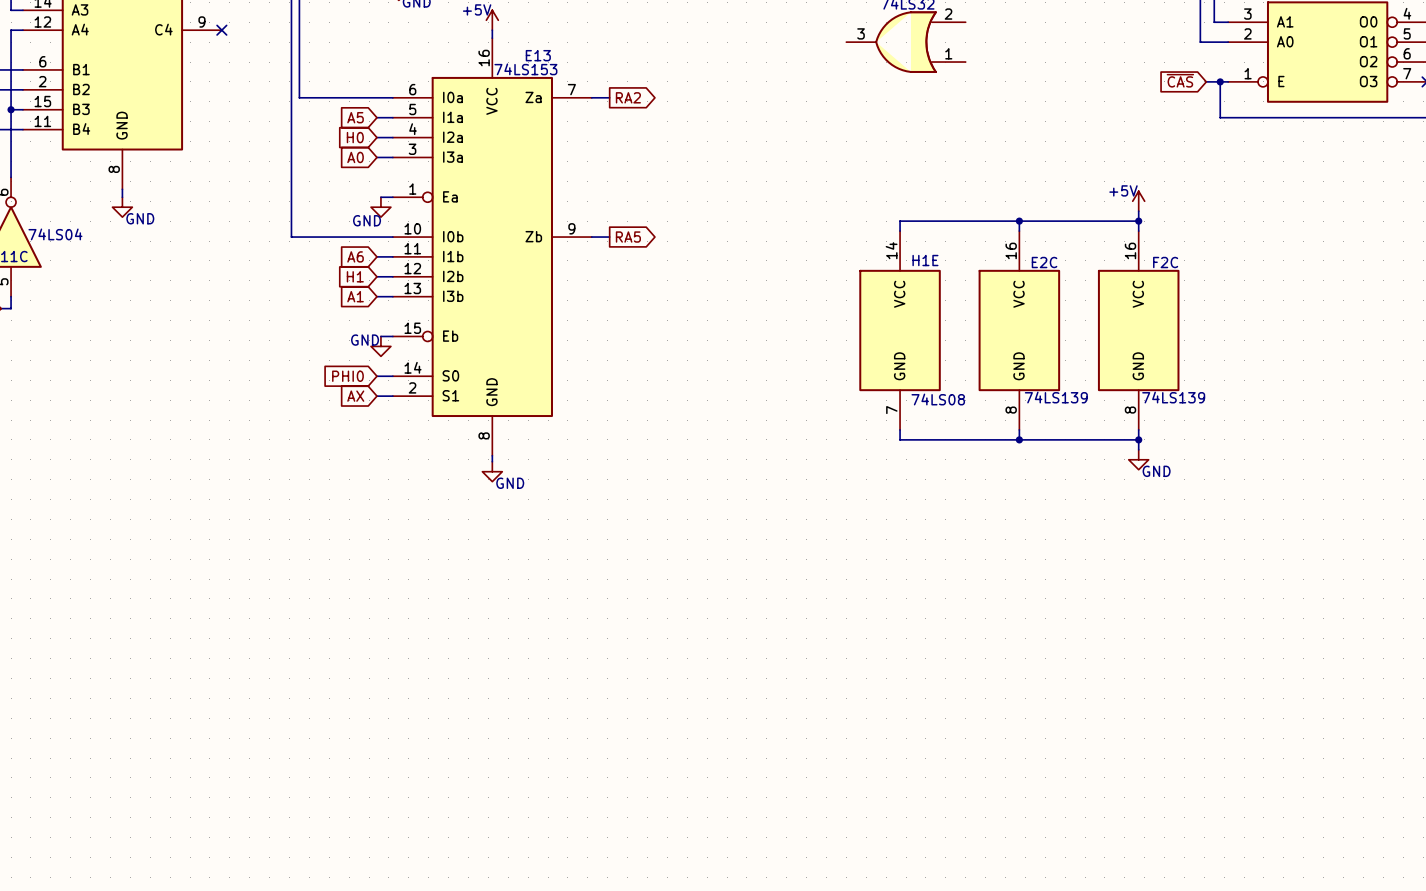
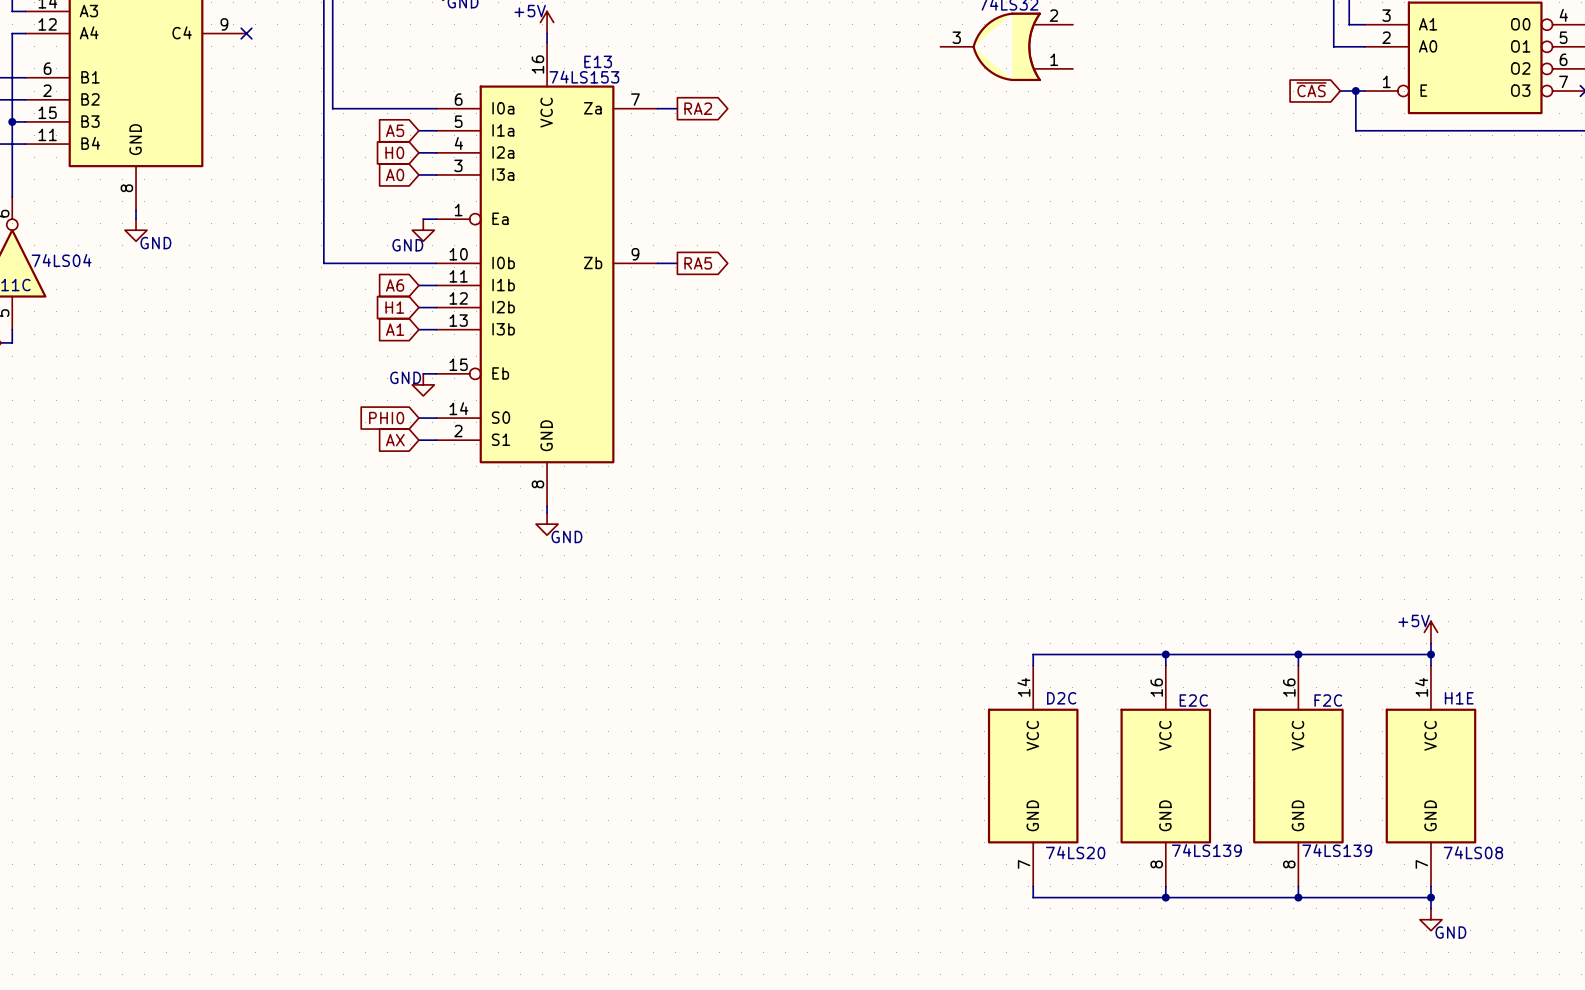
power symbol: +5V (1138, 201) -> none
wire: (1138, 211) (1138, 231) -> none
wire: (1019, 221) (1019, 231) -> none
junction: (1019, 221) -> none
wire: (1138, 221) (900, 221) (900, 231) -> none
junction: (1138, 221) -> none
H1E position: (900, 330) -> (1430, 776)
E2C position: (1019, 330) -> (1165, 776)
F2C position: (1138, 330) -> (1298, 776)
wire: (900, 429) (900, 439) (1138, 439) -> none
wire: (1019, 429) (1019, 439) -> (1165, 654) (1165, 665)
wire: (1138, 429) (1138, 449) -> none
junction: (1019, 439) -> none
junction: (1138, 439) -> none
power symbol: GND (1138, 459) -> none
power symbol: none -> +5V (1430, 632)
wire: none -> (1430, 643) (1430, 665)
junction: none -> (1165, 654)
wire: none -> (1298, 654) (1298, 665)
junction: none -> (1298, 654)
wire: none -> (1430, 654) (1033, 654) (1033, 665)
junction: none -> (1430, 654)
D2C: none -> 74LS20 (1033, 776)
wire: none -> (1033, 886) (1033, 897) (1430, 897)
wire: none -> (1165, 886) (1165, 897)
wire: none -> (1298, 886) (1298, 897)
wire: none -> (1430, 886) (1430, 908)
junction: none -> (1165, 897)
junction: none -> (1298, 897)
junction: none -> (1430, 897)
power symbol: none -> GND (1430, 919)

